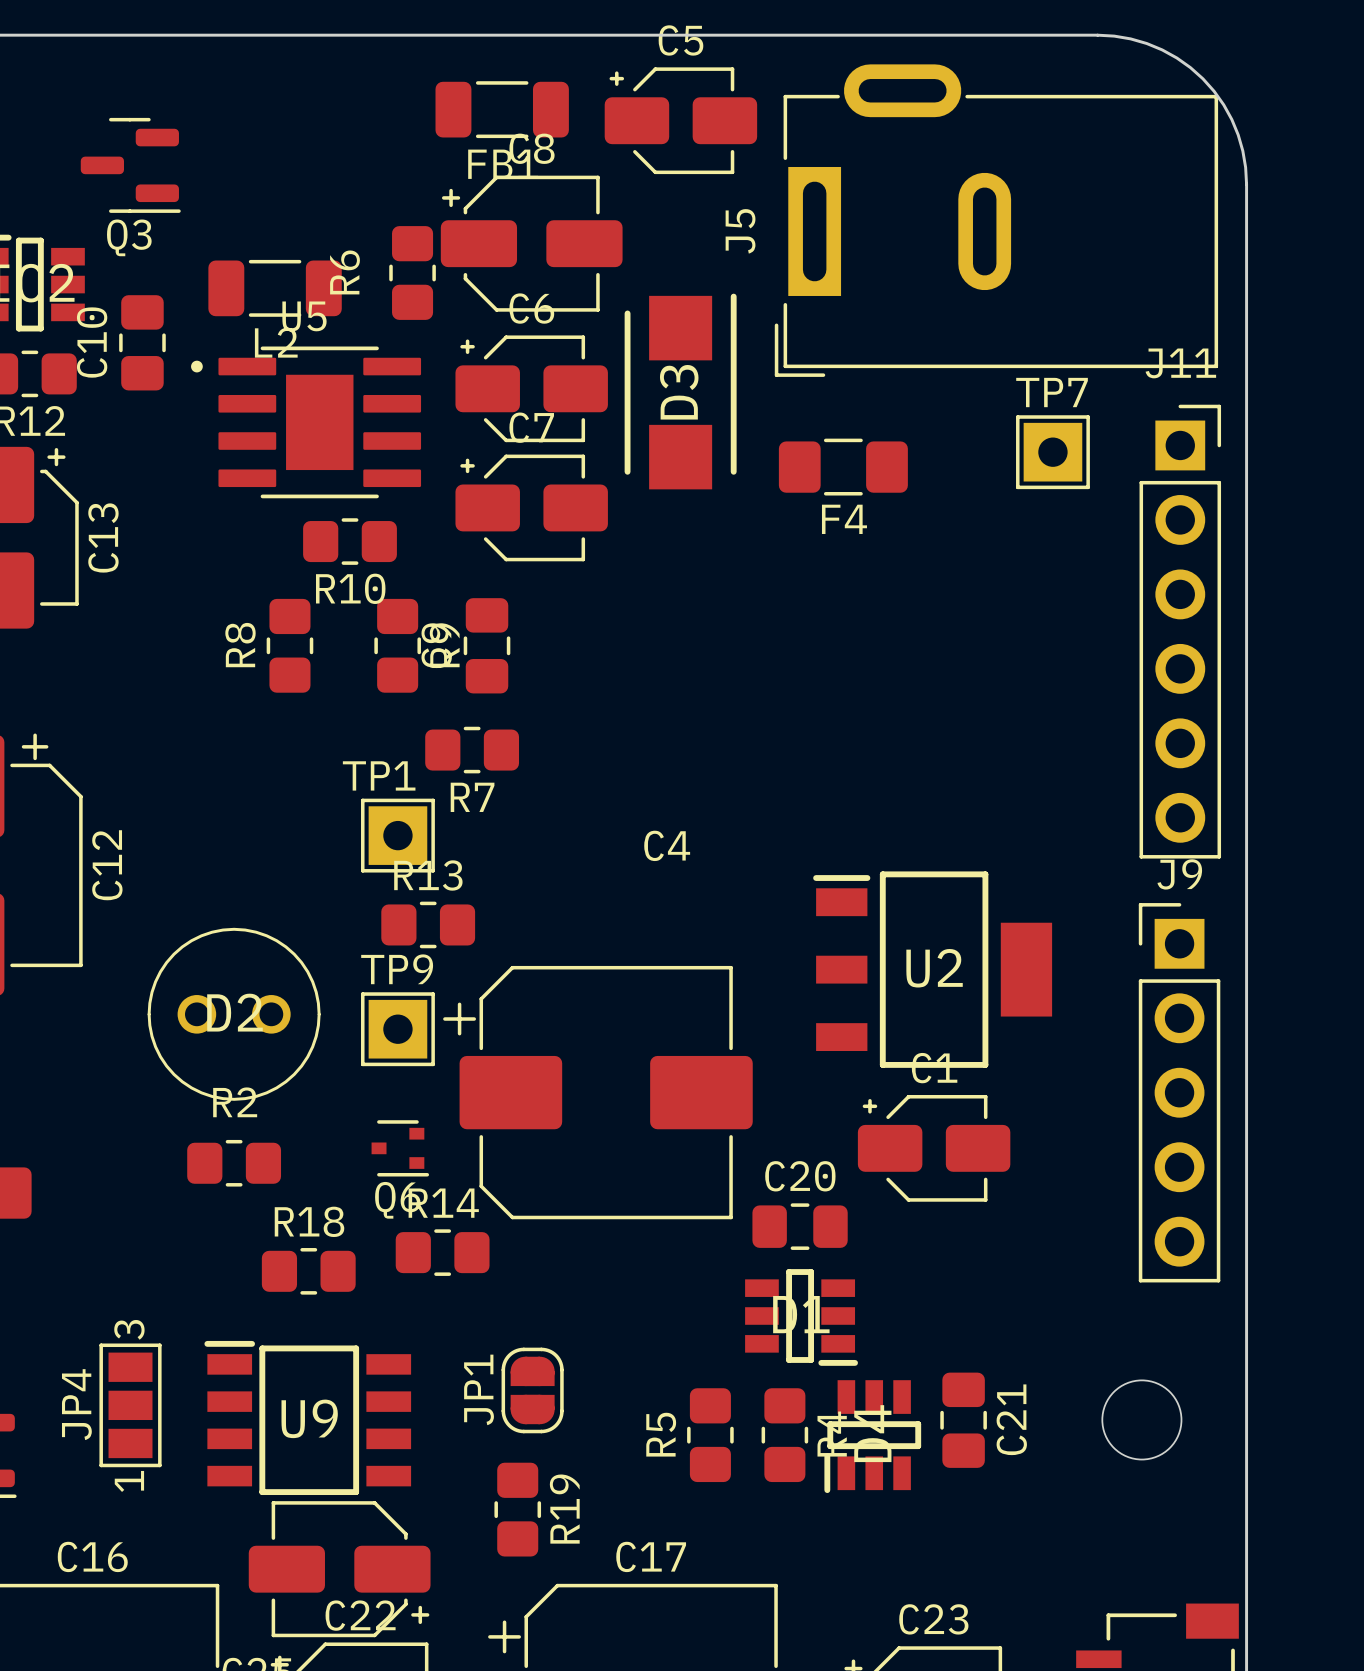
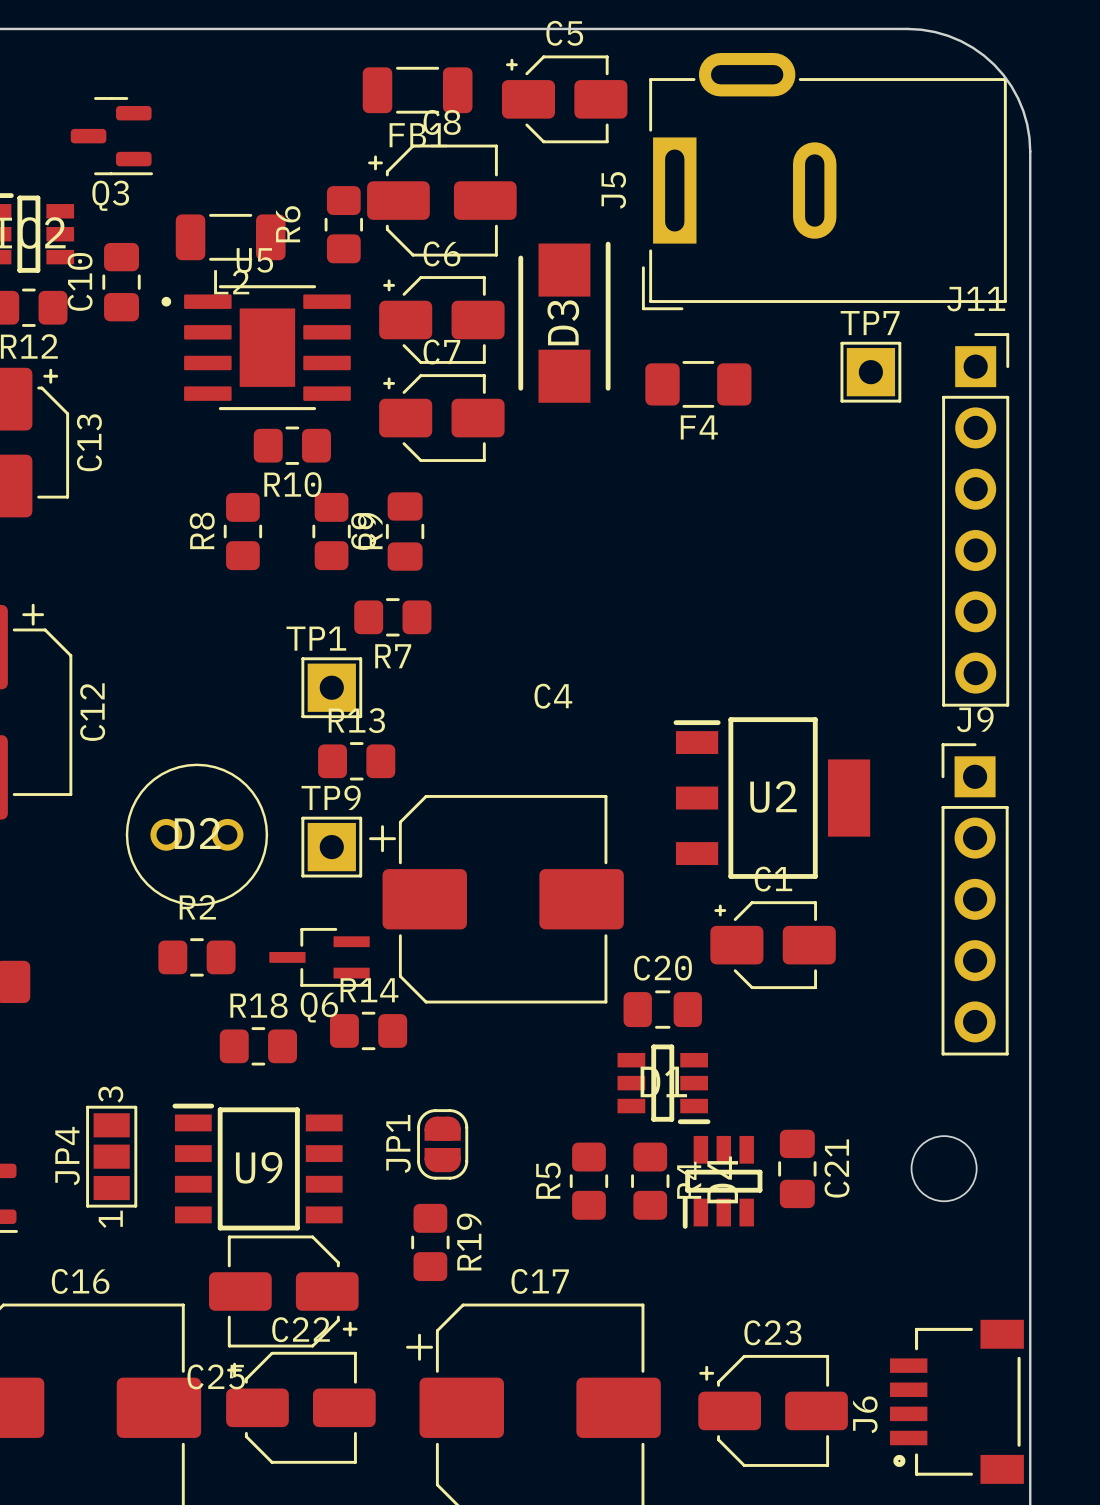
Q6 footprint: [371, 1120, 430, 1177] -> [269, 927, 370, 988]

